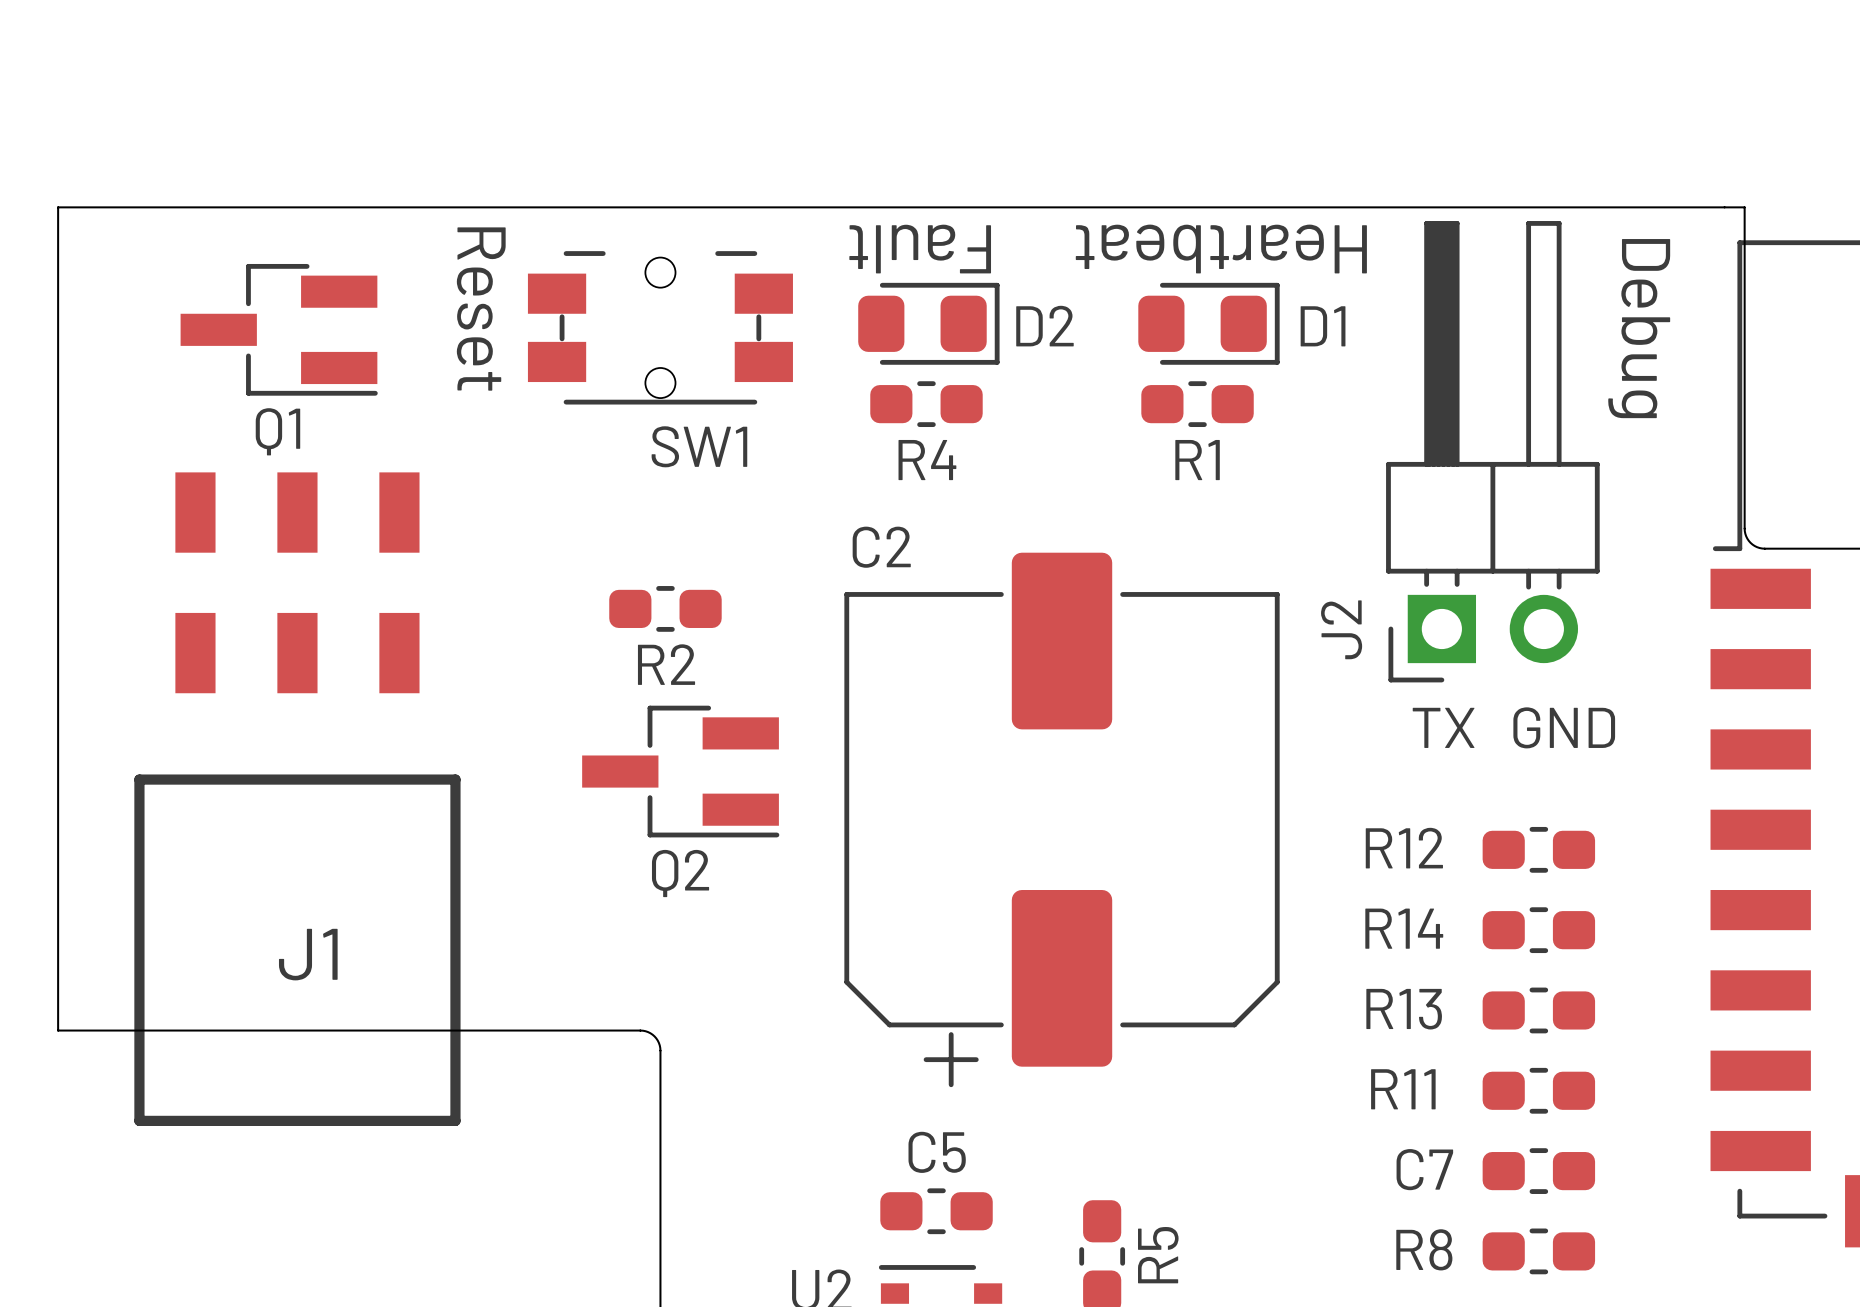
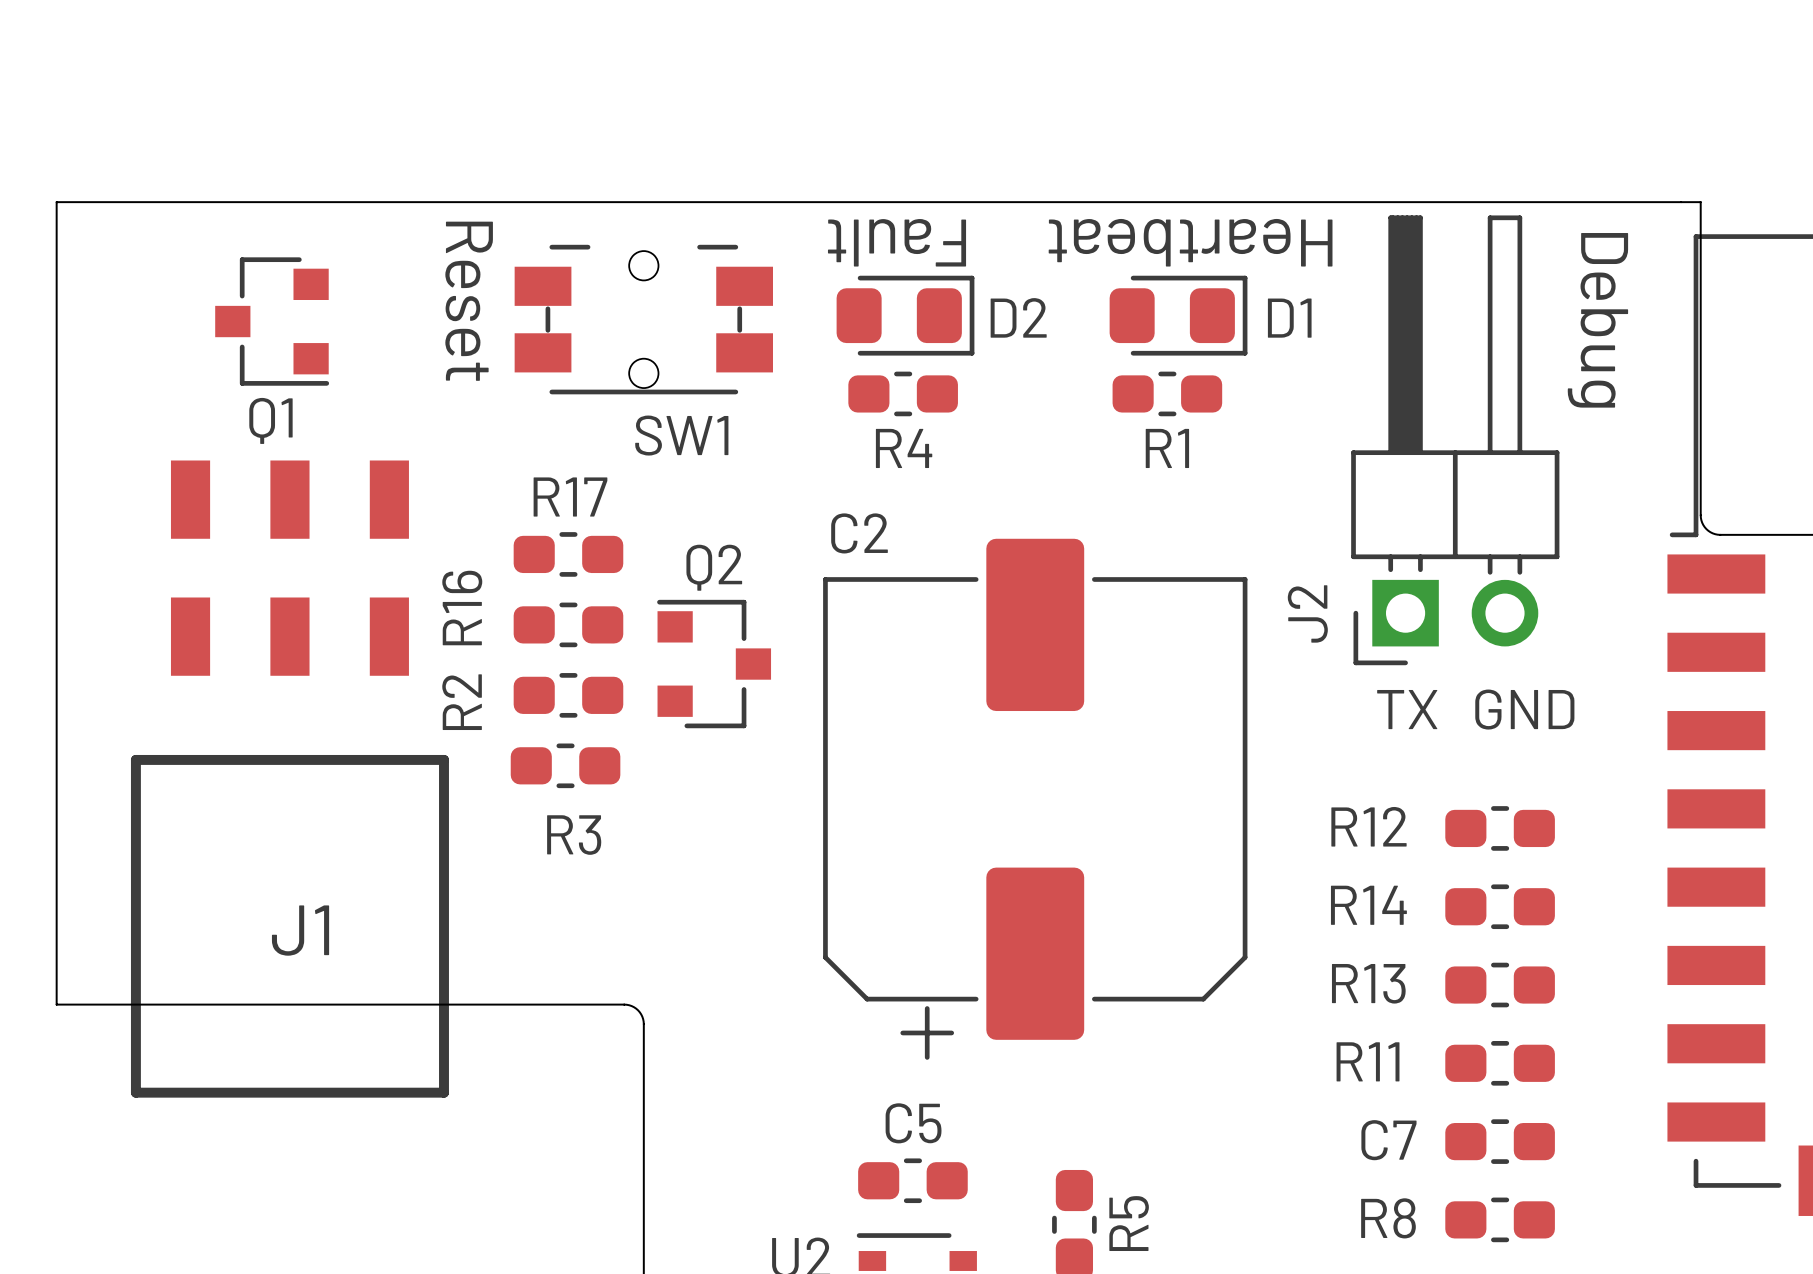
Q1 footprint: [180, 263, 378, 396] -> [215, 257, 330, 386]
R17: none -> (568, 554)
R2 position: (665, 608) -> (568, 695)
R16: none -> (568, 624)
R2 name rotation: 0° (666, 664) -> 90° counterclockwise (462, 702)
R2 name position: R2 (666, 664) -> R2 (462, 702)
Q2 footprint: [582, 705, 780, 838] -> [657, 599, 772, 729]
R3: none -> (565, 765)
Q2 name position: Q2 (680, 873) -> Q2 (714, 567)

